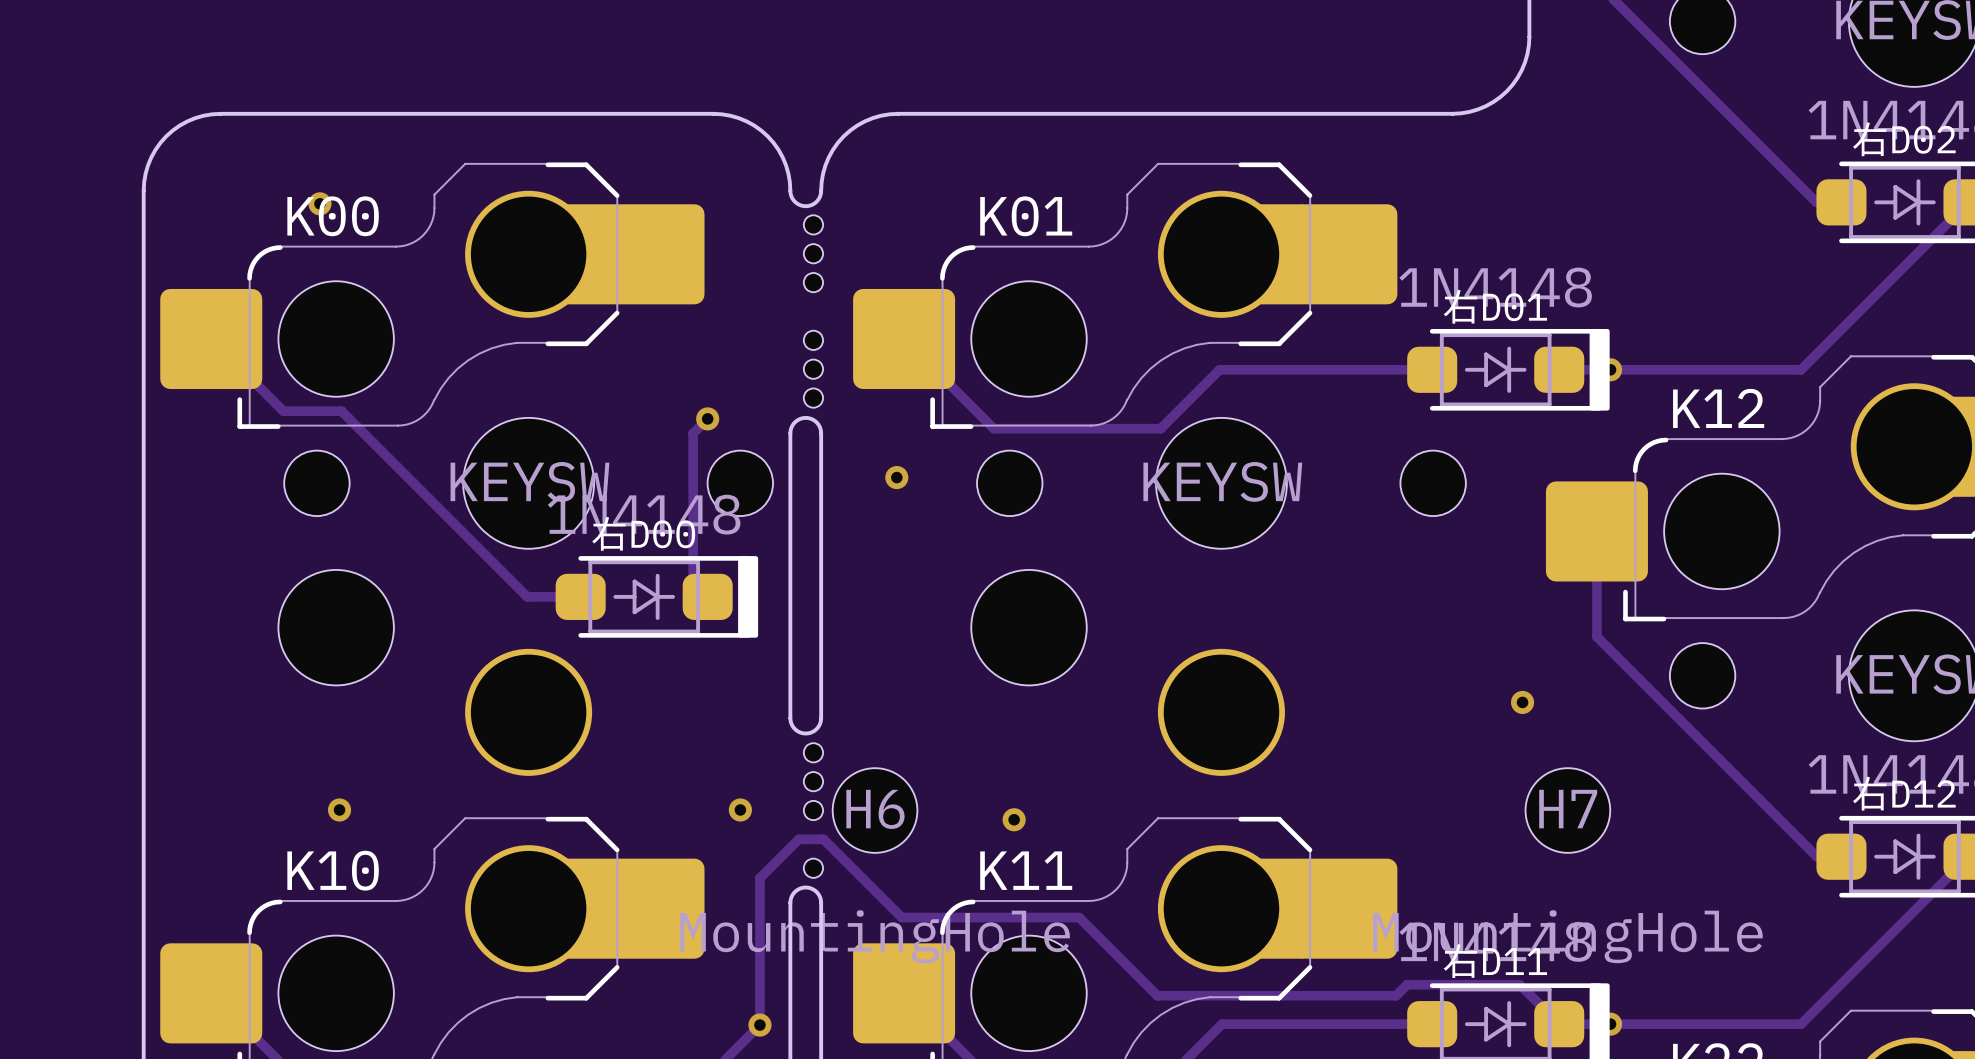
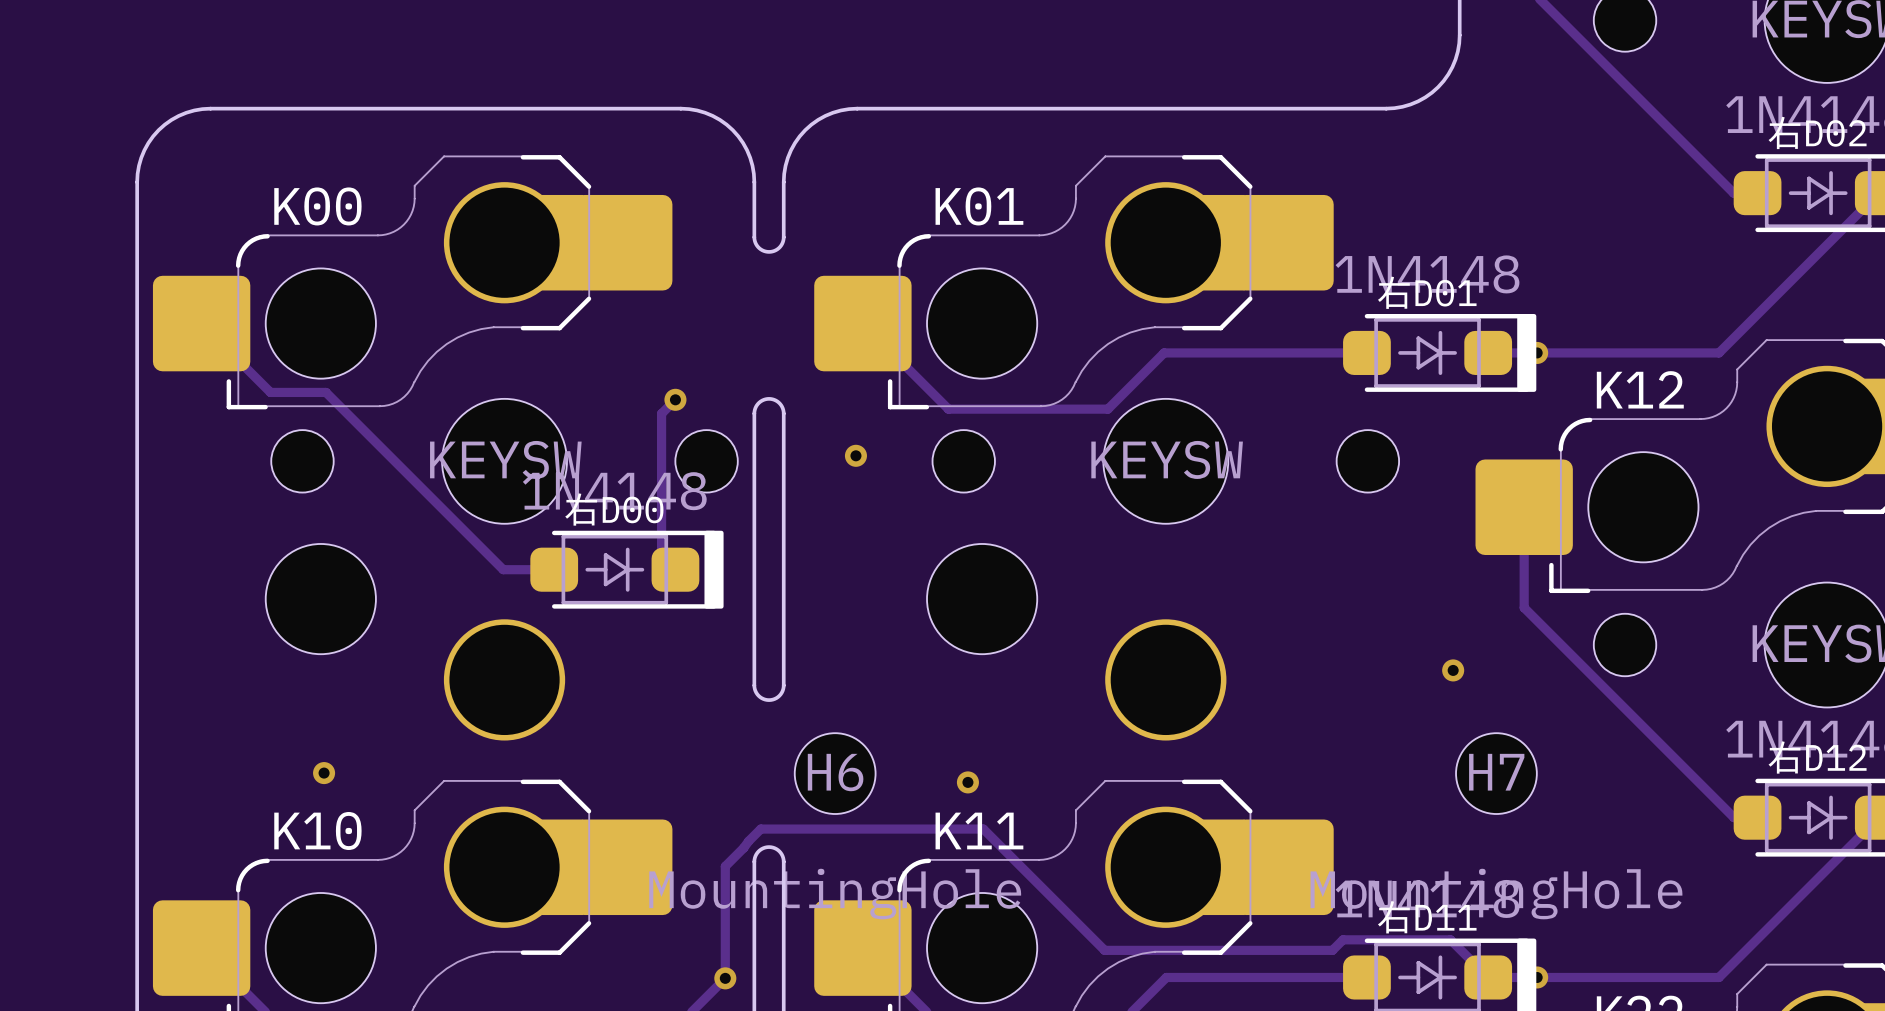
board edge: (790, 190) (795, 202) (805, 206) (817, 201) (821, 190) -> (754, 182) (754, 240) (760, 249) (769, 251) (777, 249) (783, 240) (783, 182)
via: (319, 203) -> none
part: (813, 311) -> none
via: (740, 809) -> none
part: (813, 810) -> none
track: (759, 907) (759, 878) (798, 839) (823, 839) (901, 917) (1079, 917) -> (725, 866) (760, 829) (983, 829) (1030, 875)

